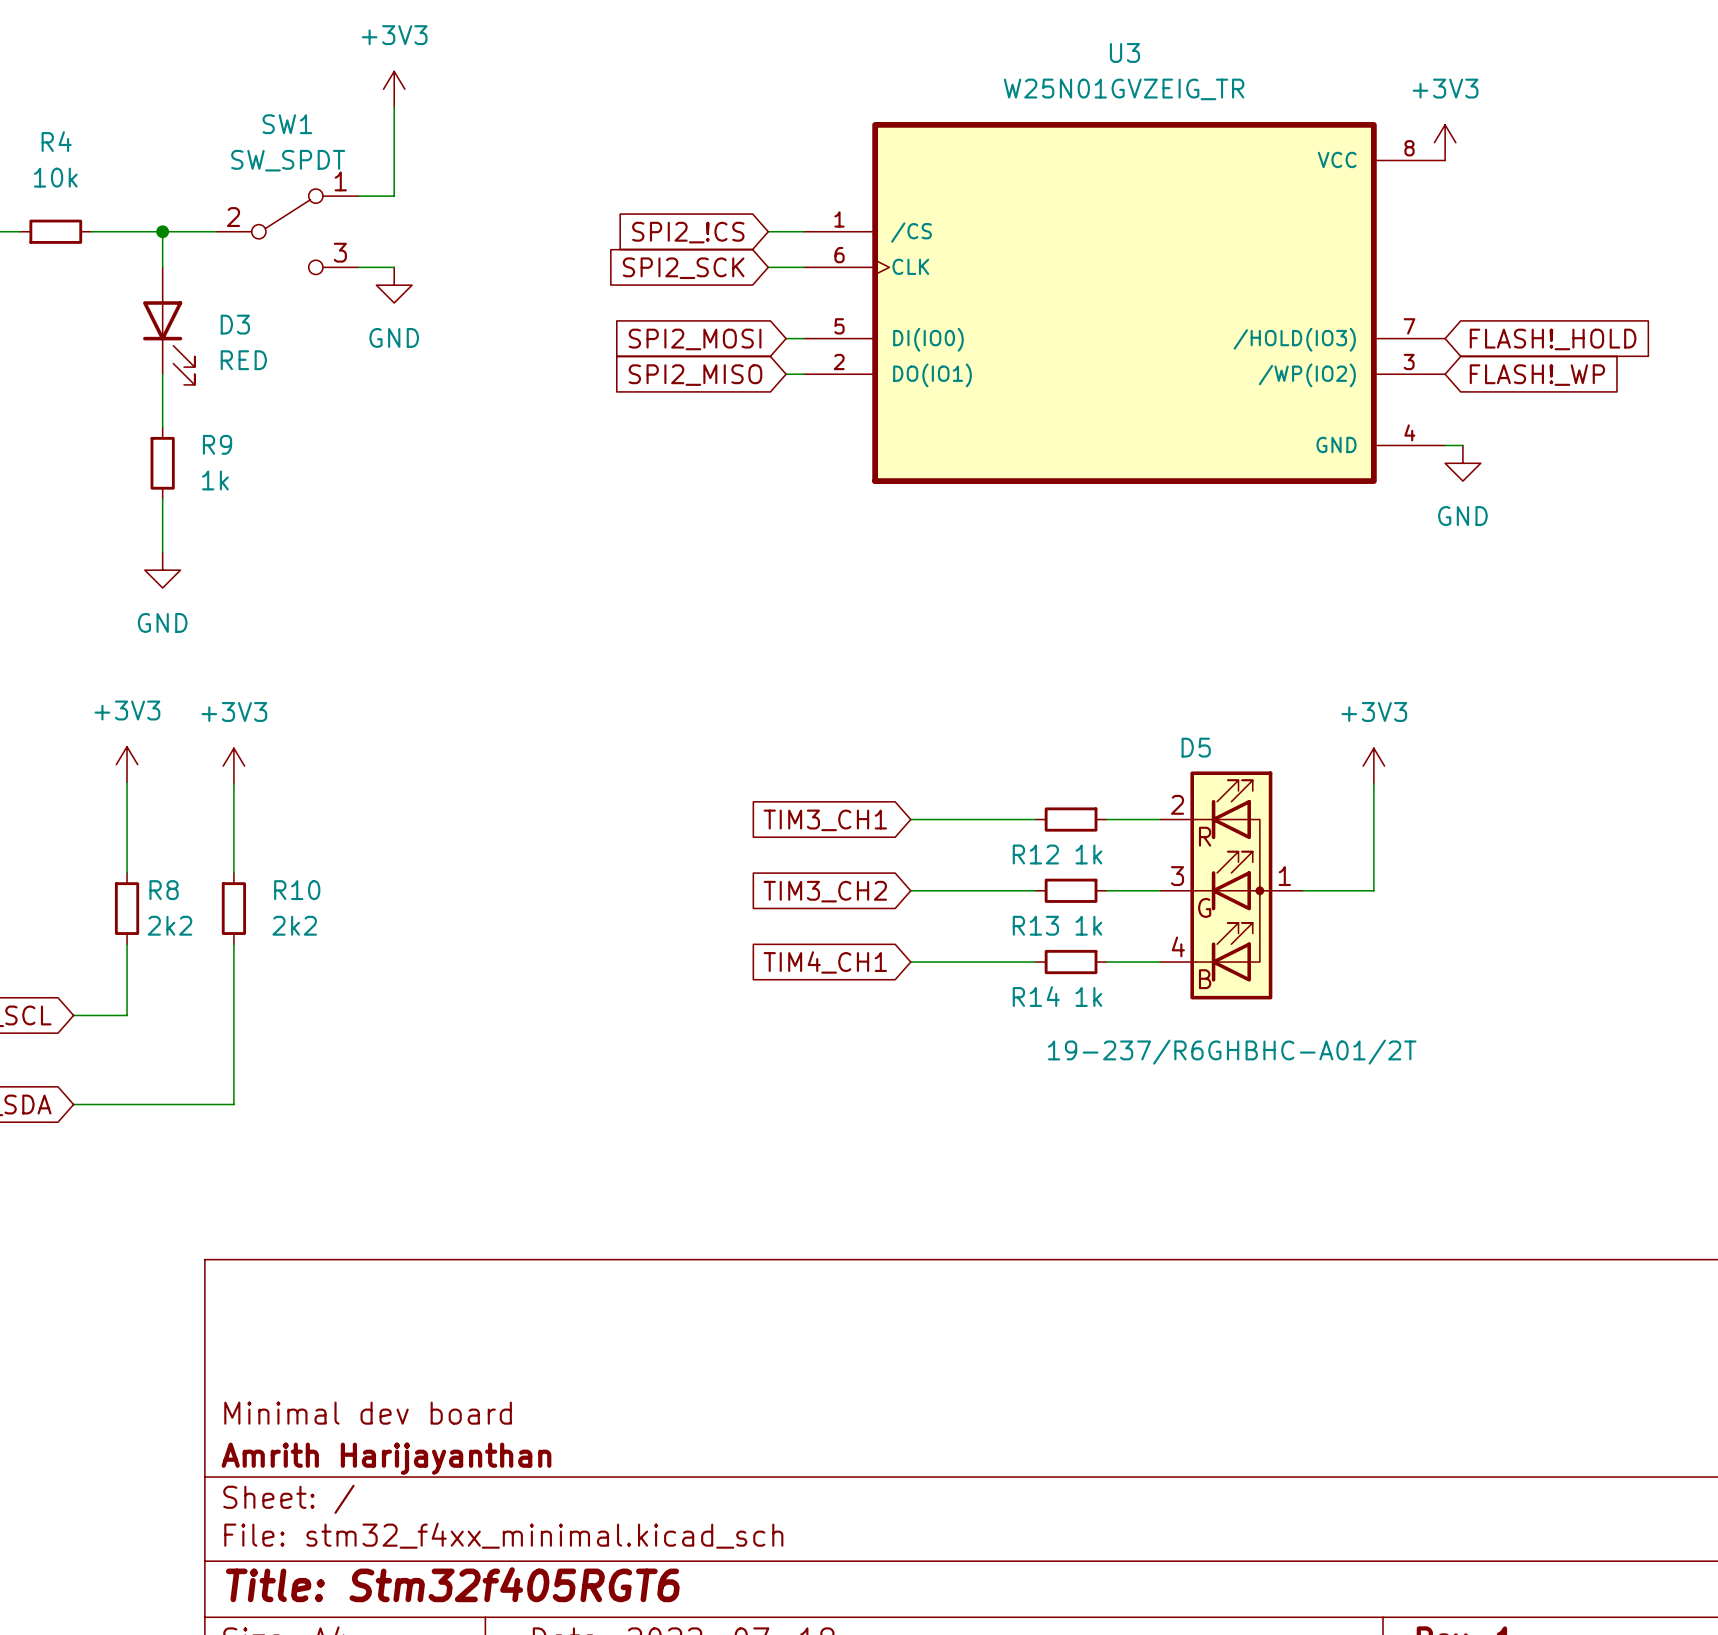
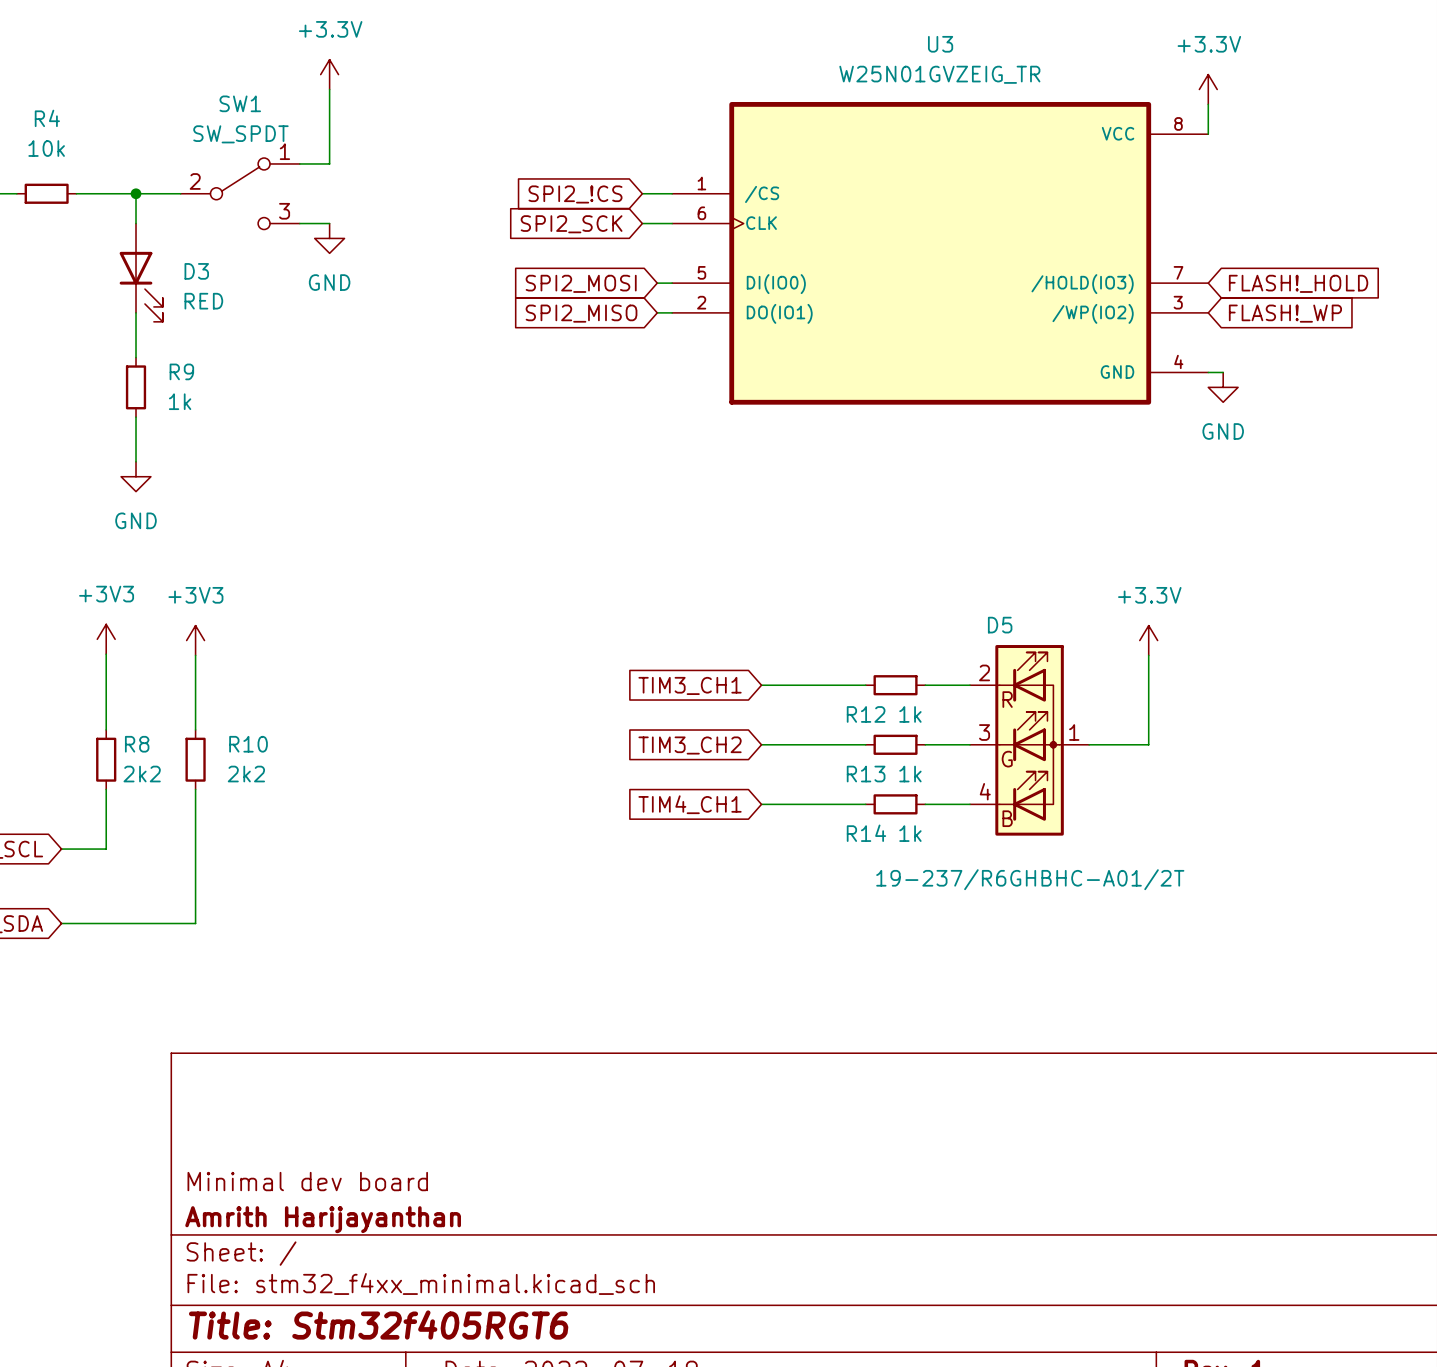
power symbol: +3V3 (394, 89) -> +3.3V (329, 74)
power symbol: none -> +3.3V (1208, 89)
power symbol: +3V3 (1445, 142) -> none
power symbol: +3V3 (1373, 766) -> +3.3V (1148, 640)

